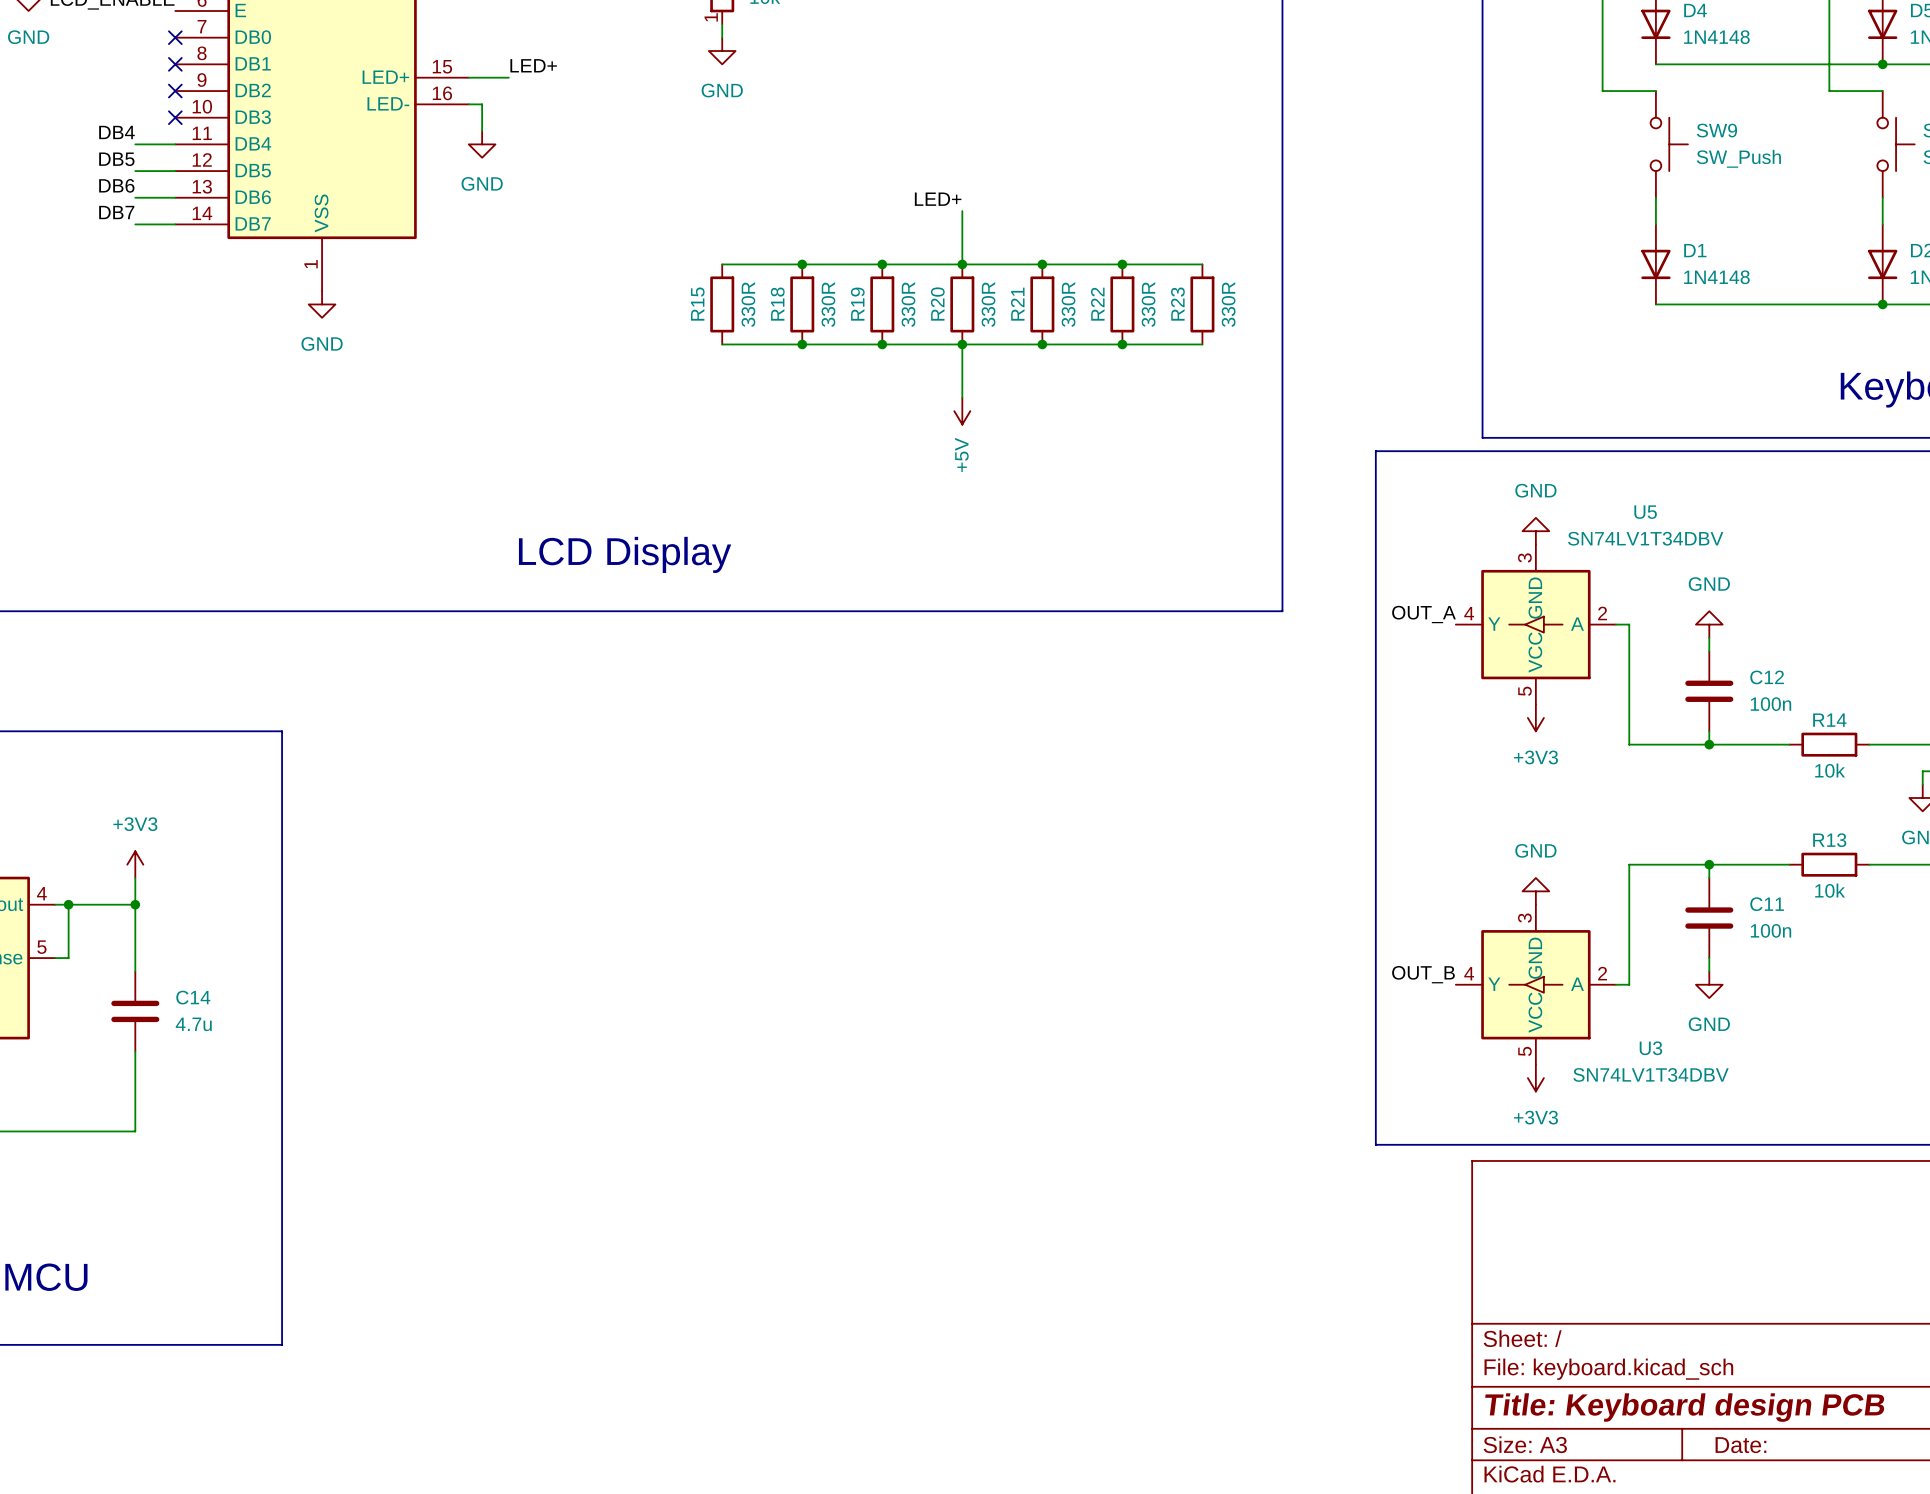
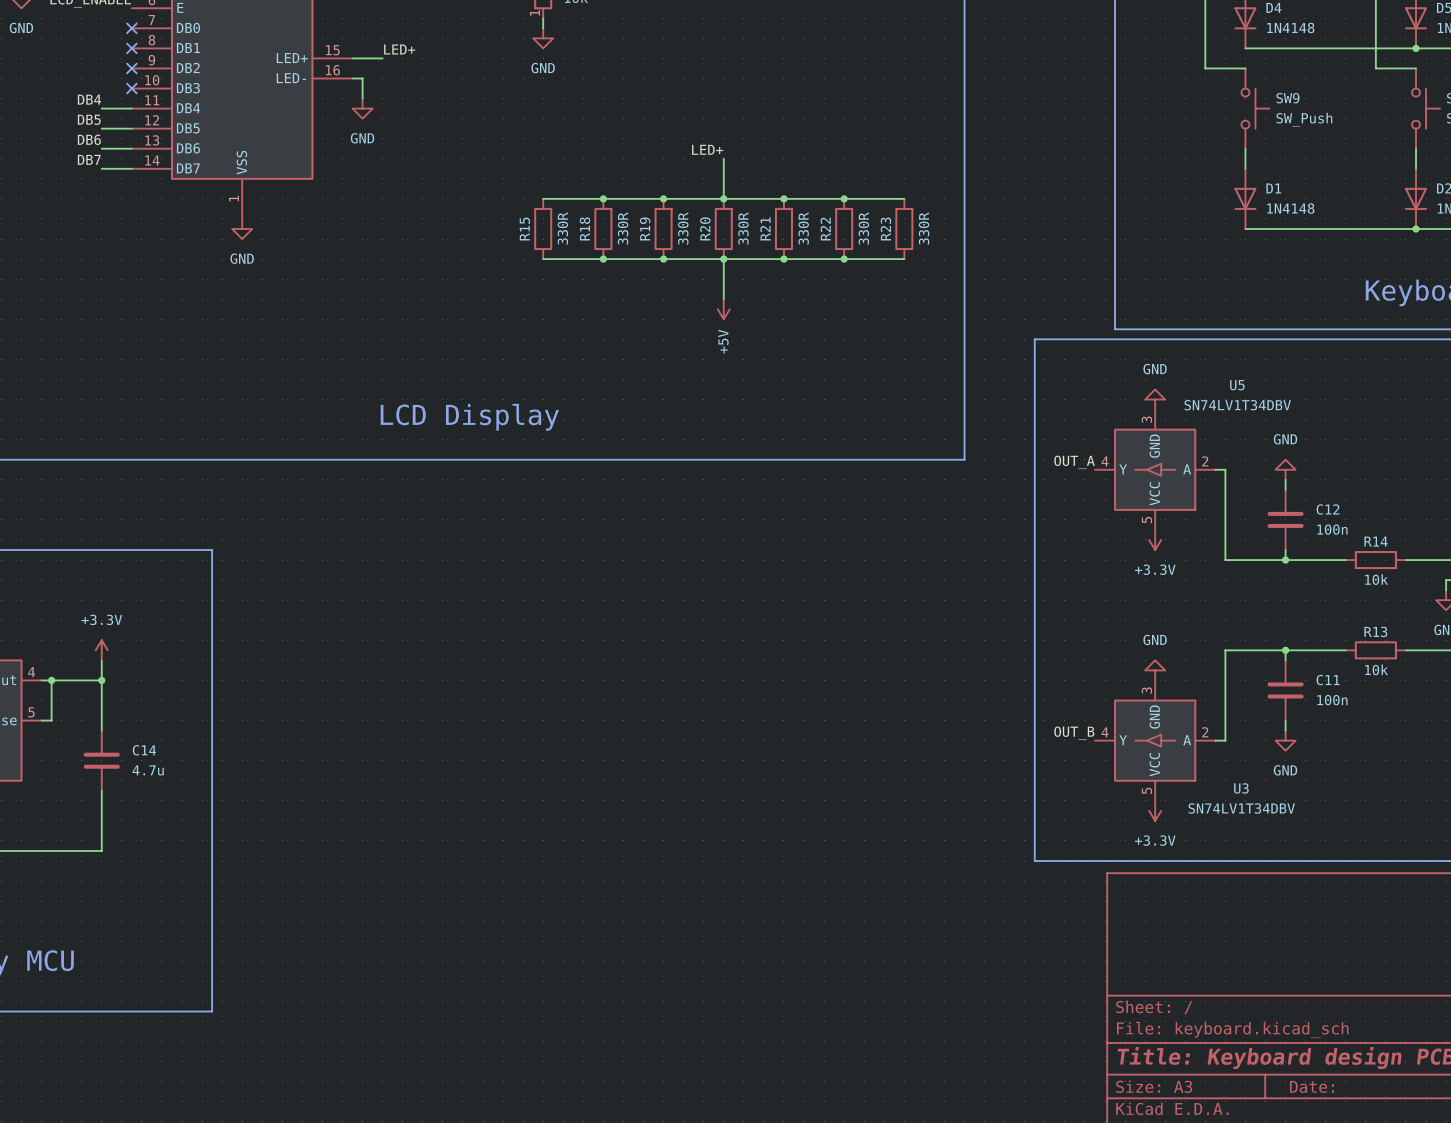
power symbol: +3V3 (1535, 717) -> +3.3V (1155, 539)
power symbol: +3V3 (135, 864) -> +3.3V (101, 650)
power symbol: +3V3 (1535, 1078) -> +3.3V (1155, 810)

